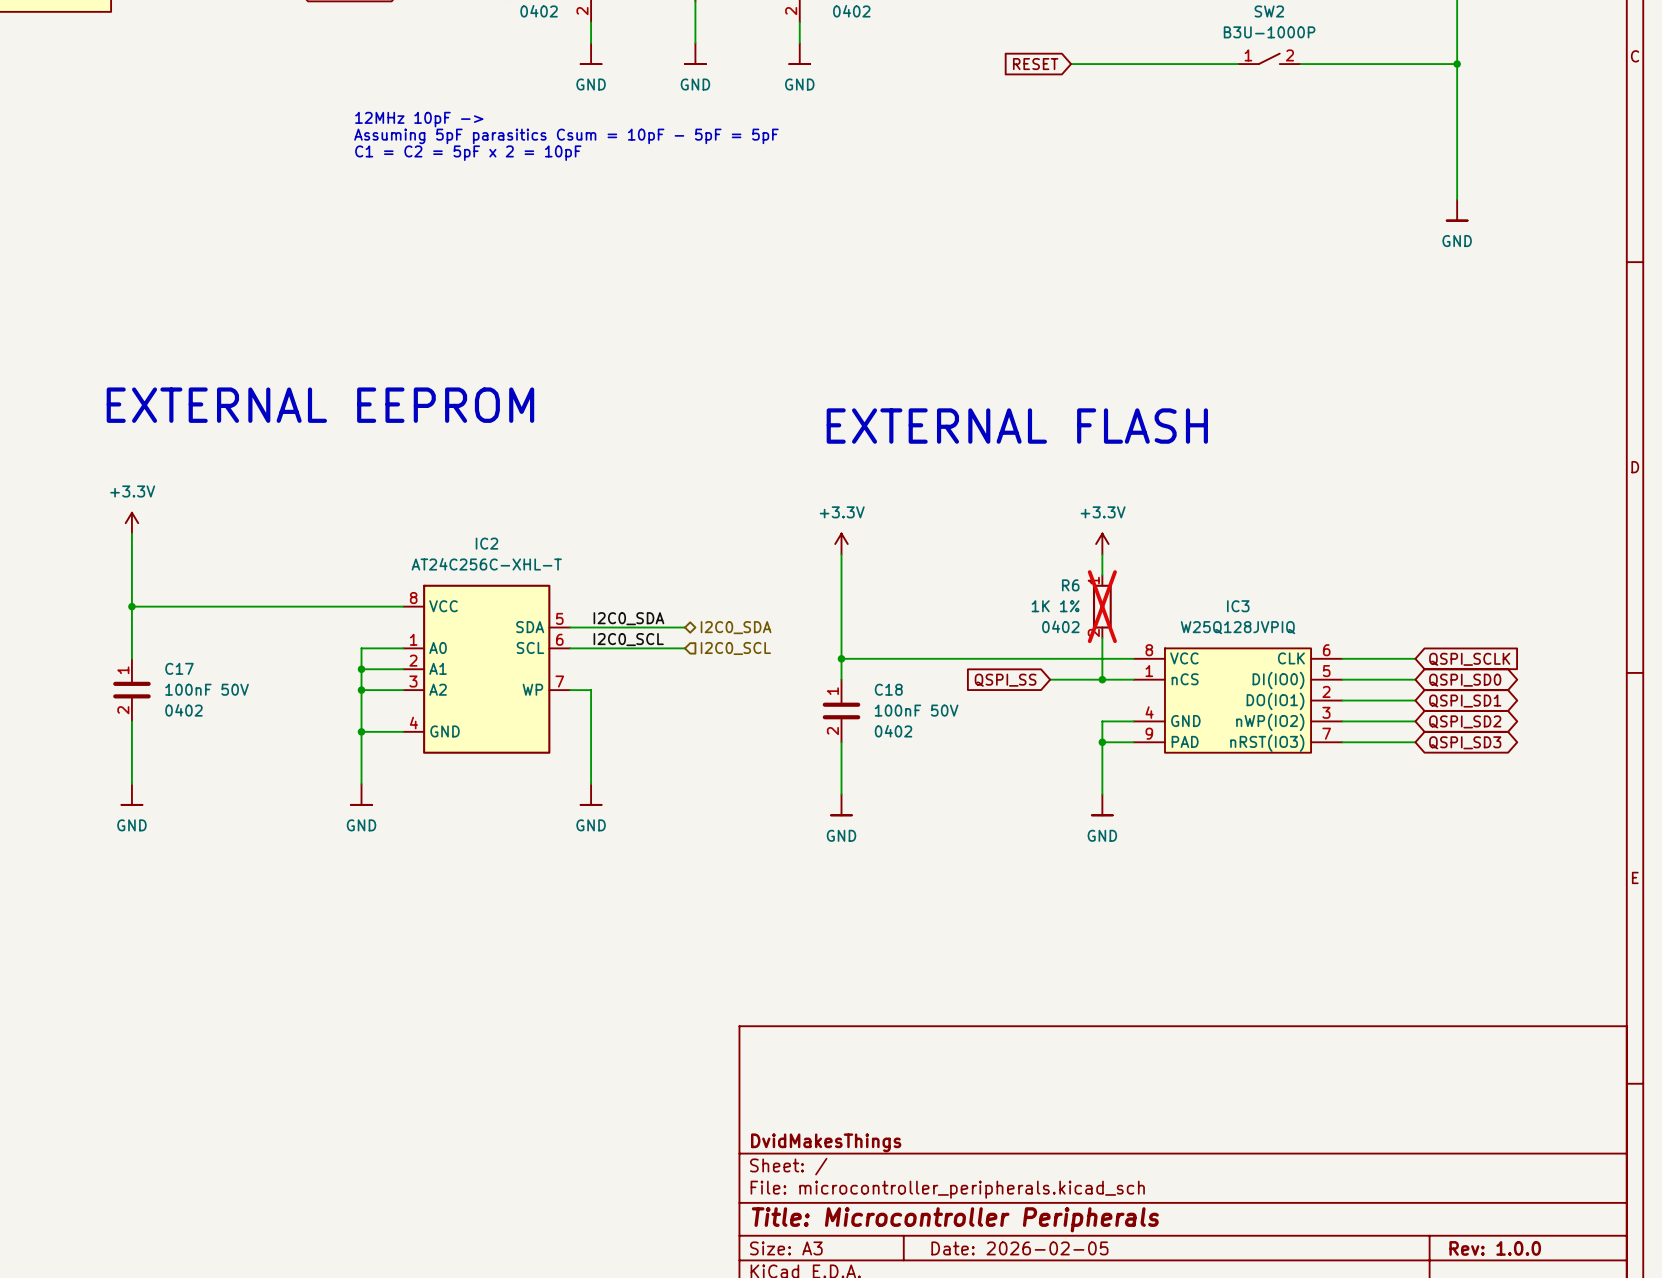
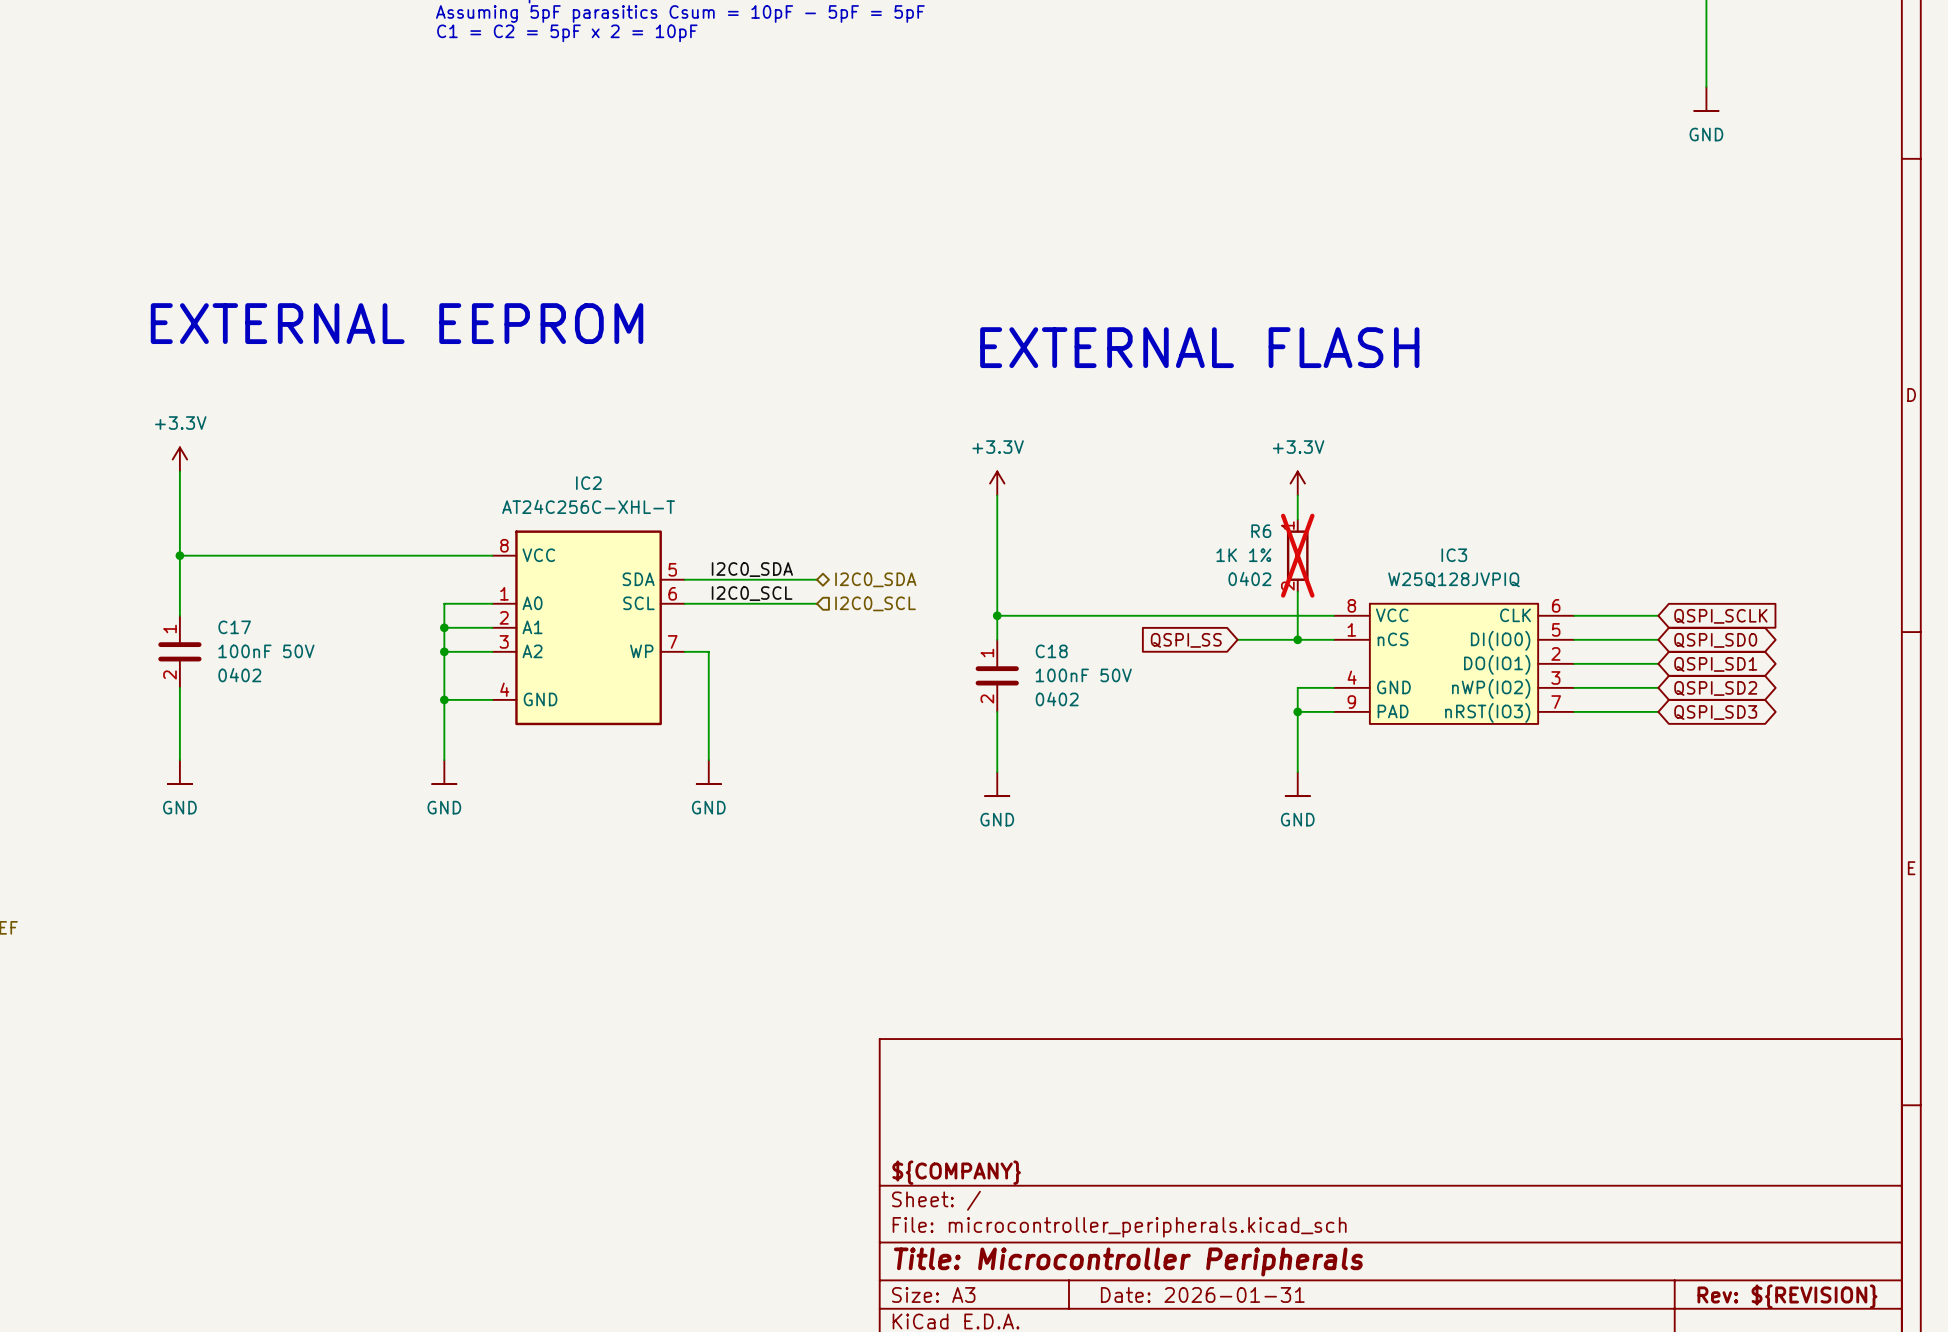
title block: DvidMakesThings (826, 1142) -> ${COMPANY} (956, 1172)
title block: Date: 2026-02-05 (1019, 1248) -> Date: 2026-01-31 (1202, 1294)
title block: Rev: 1.0.0 (1495, 1248) -> Rev: ${REVISION} (1787, 1296)

